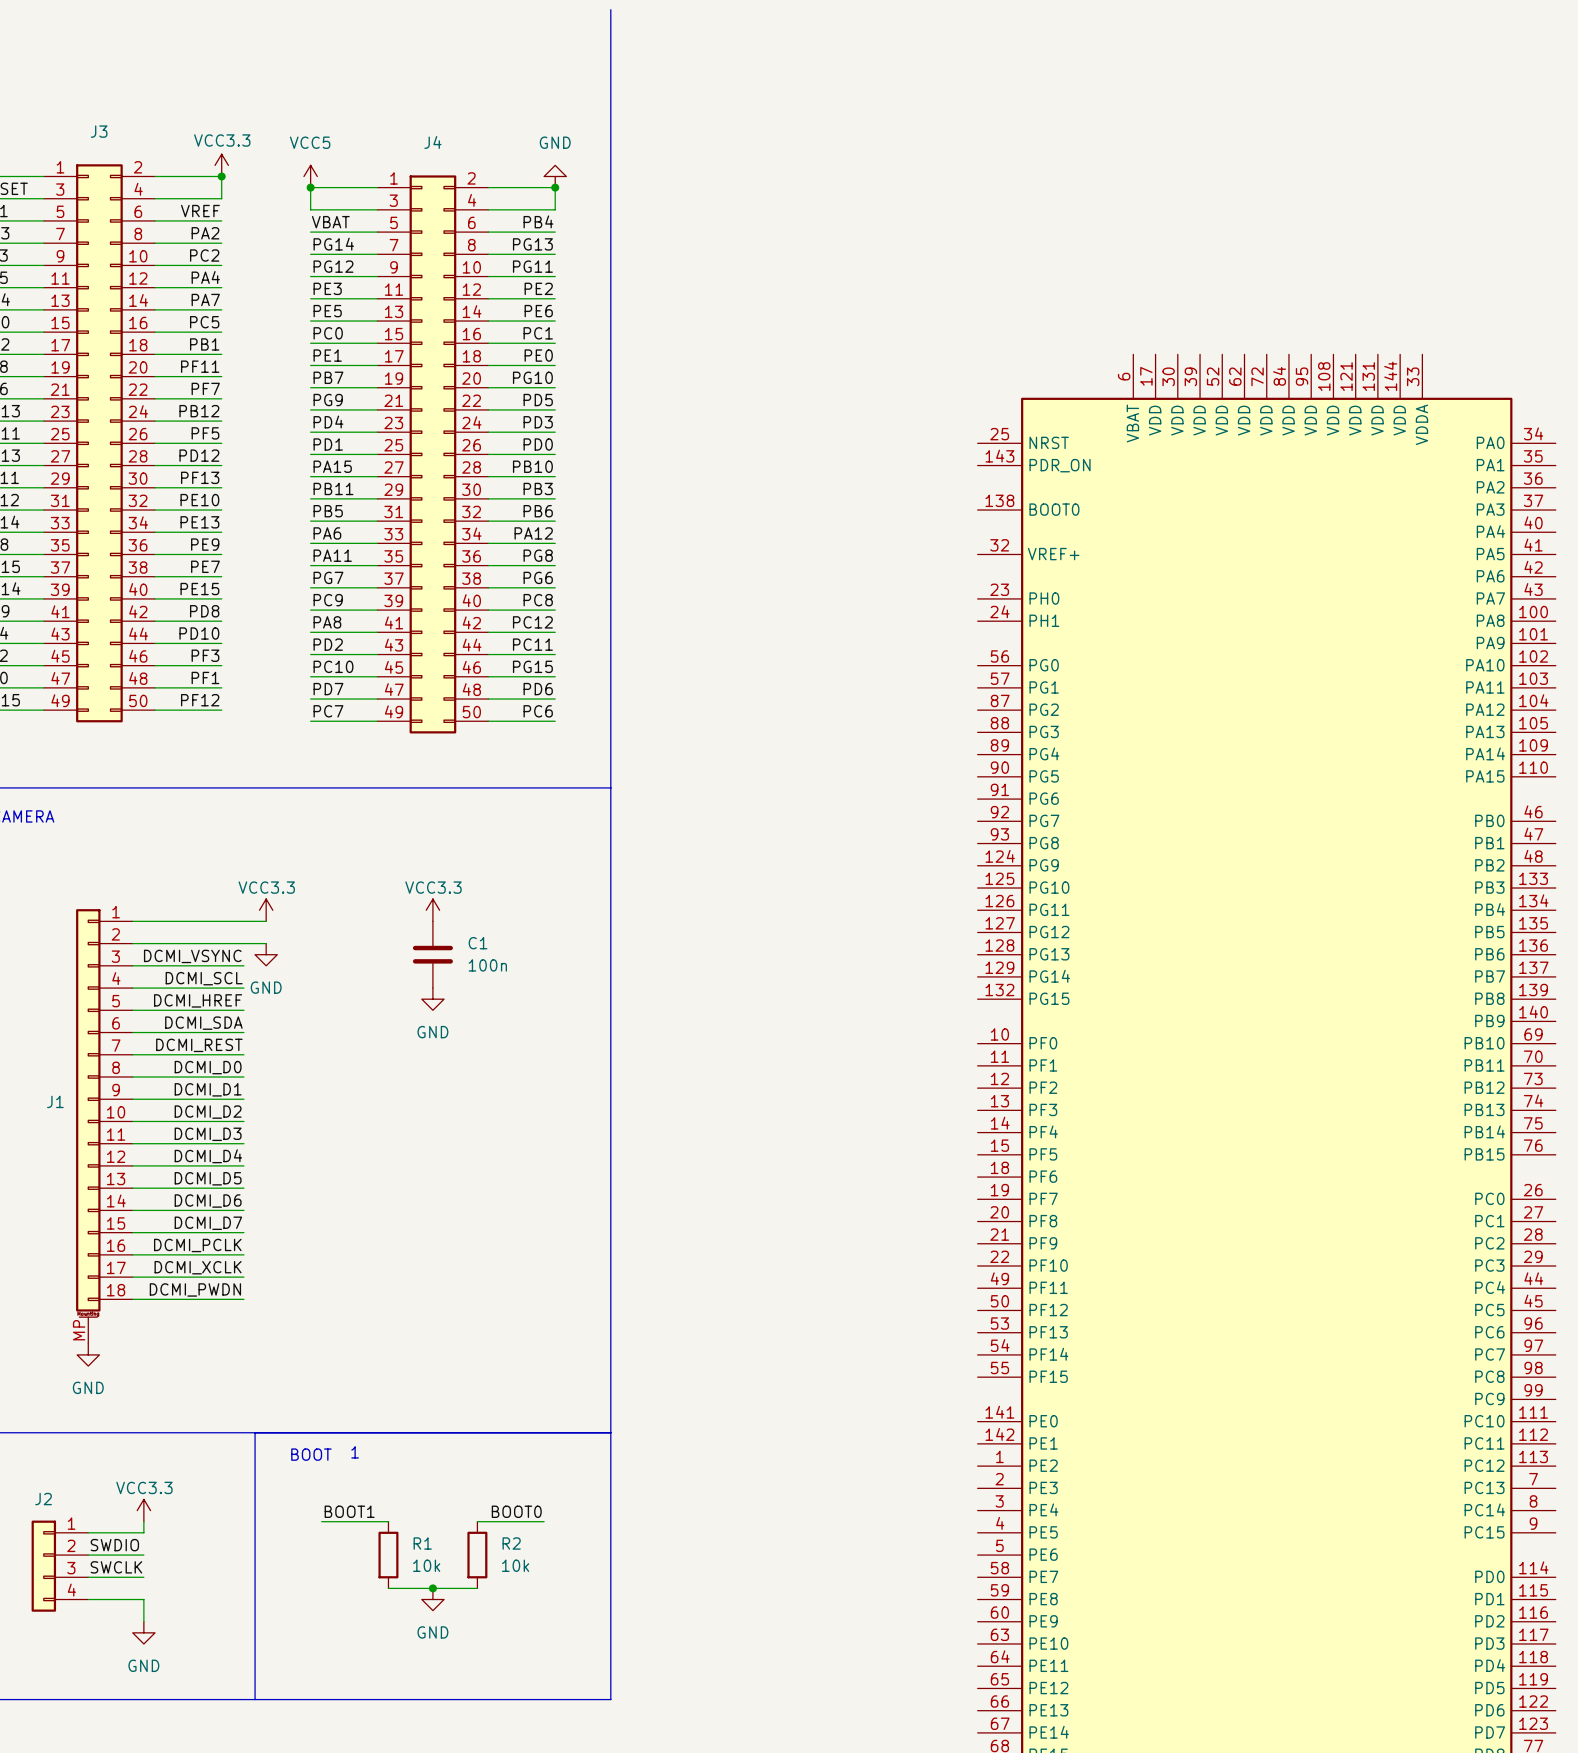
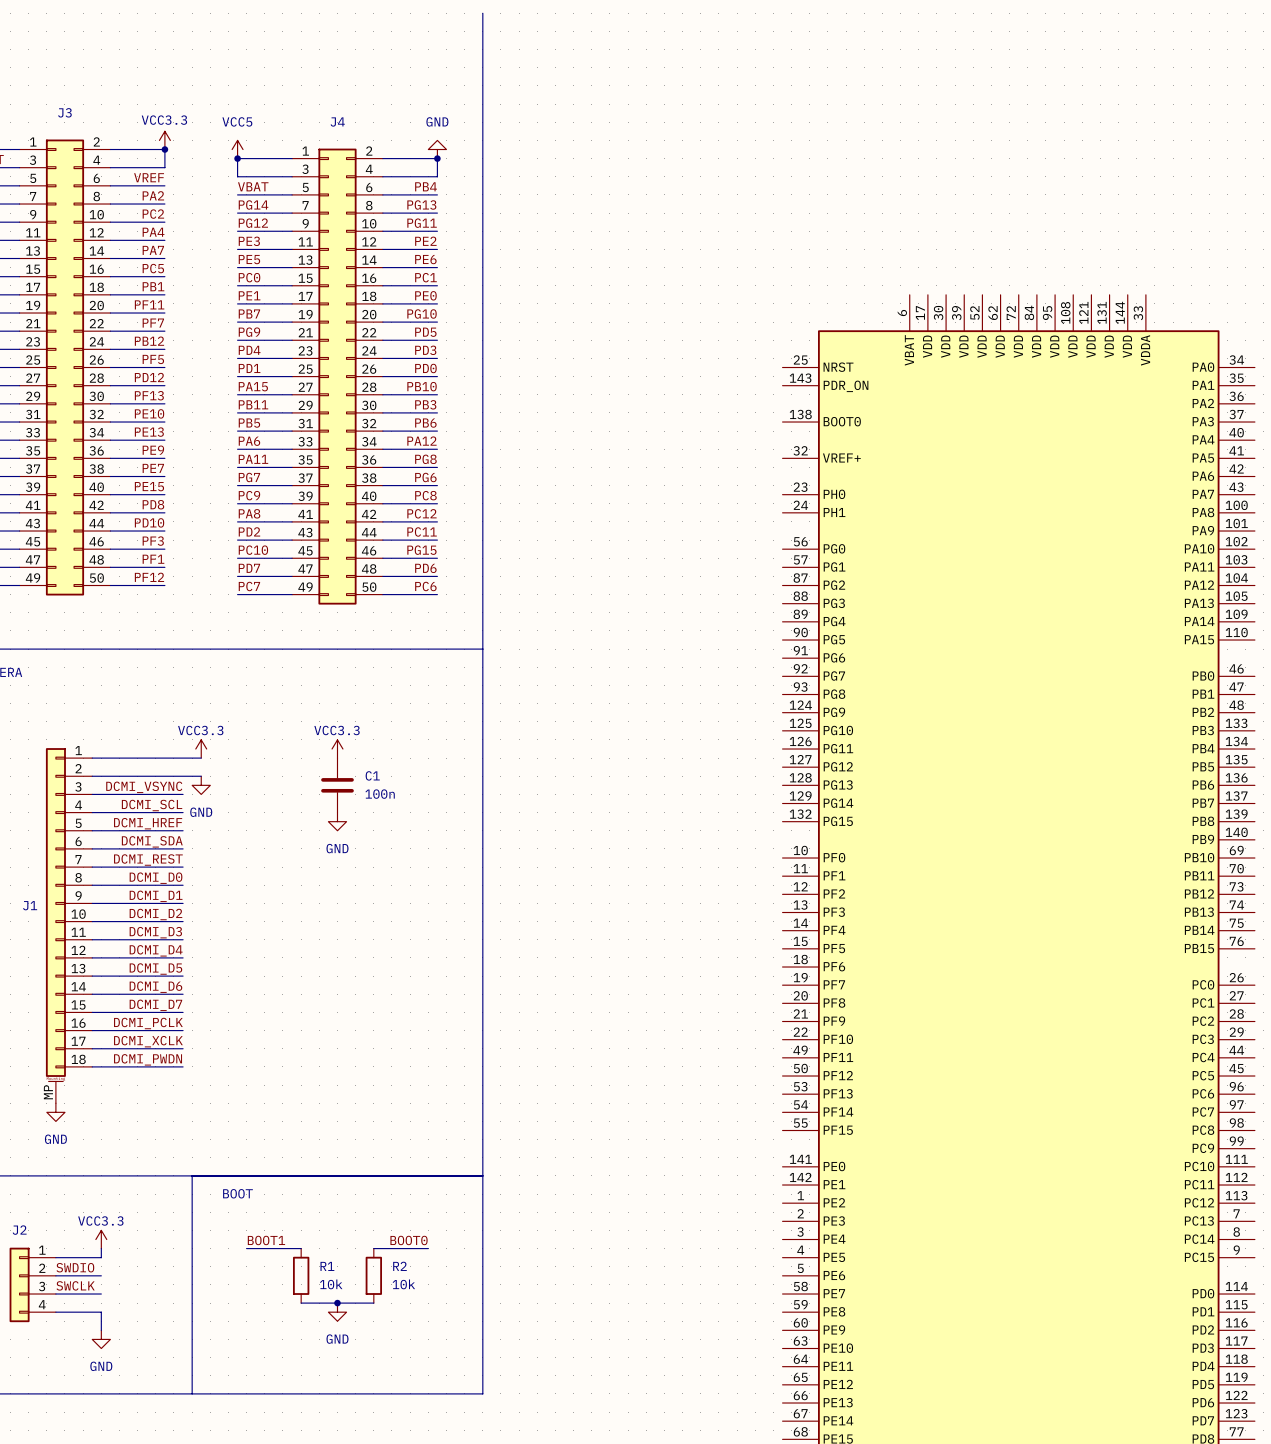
text: 1 (355, 1452) -> none

